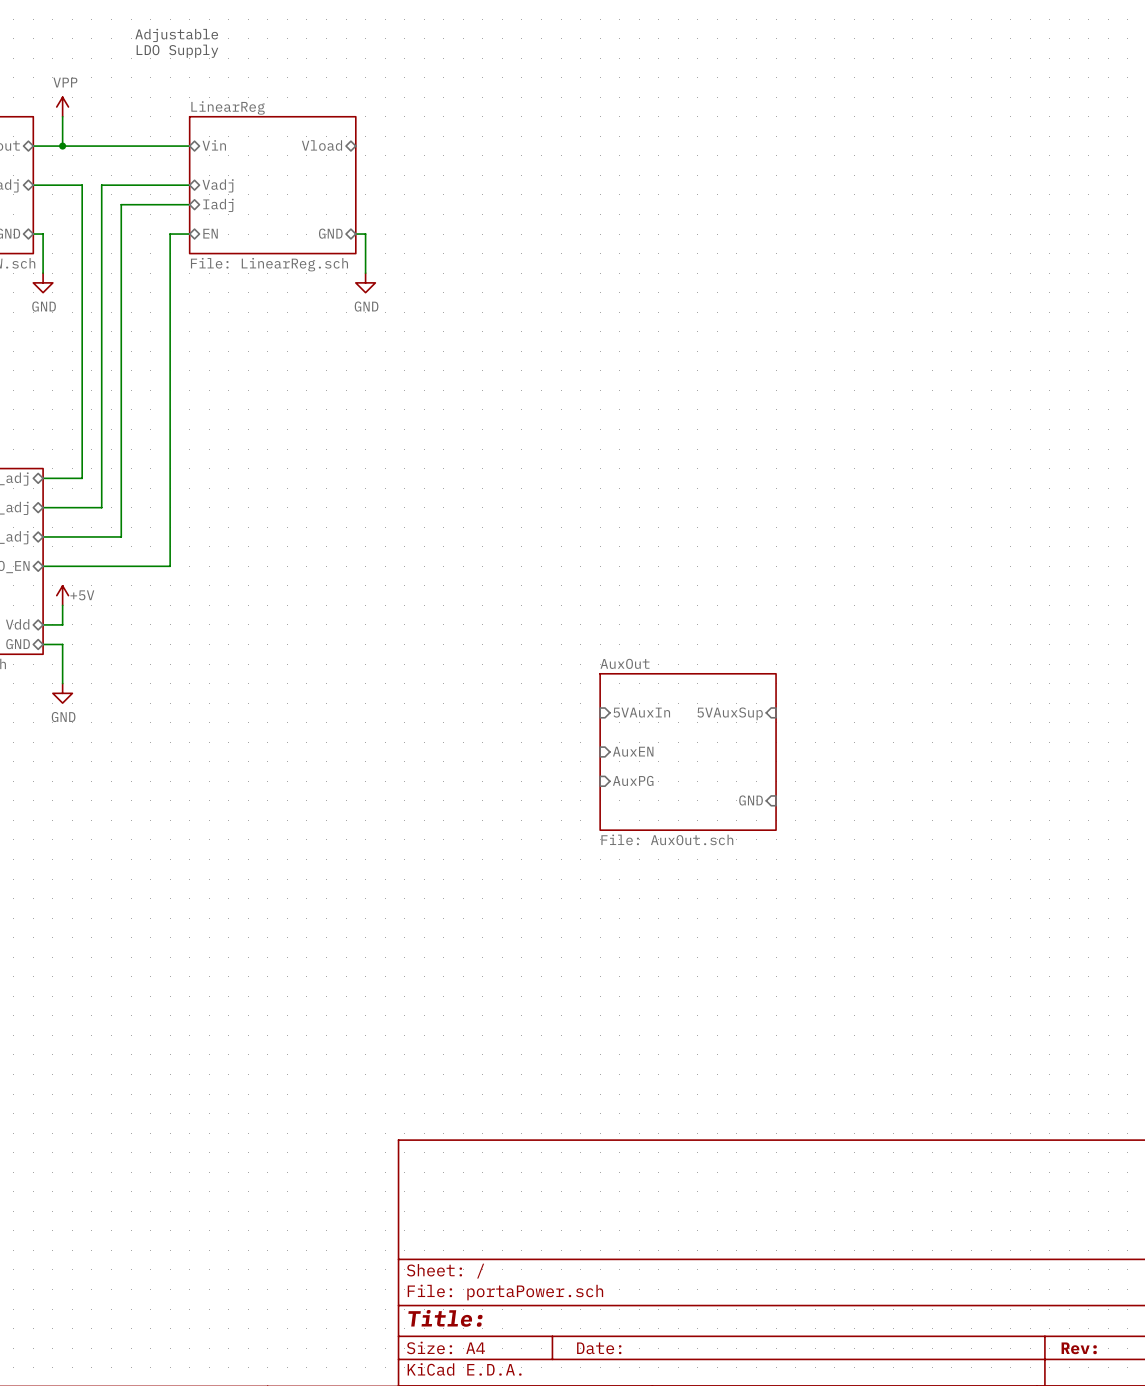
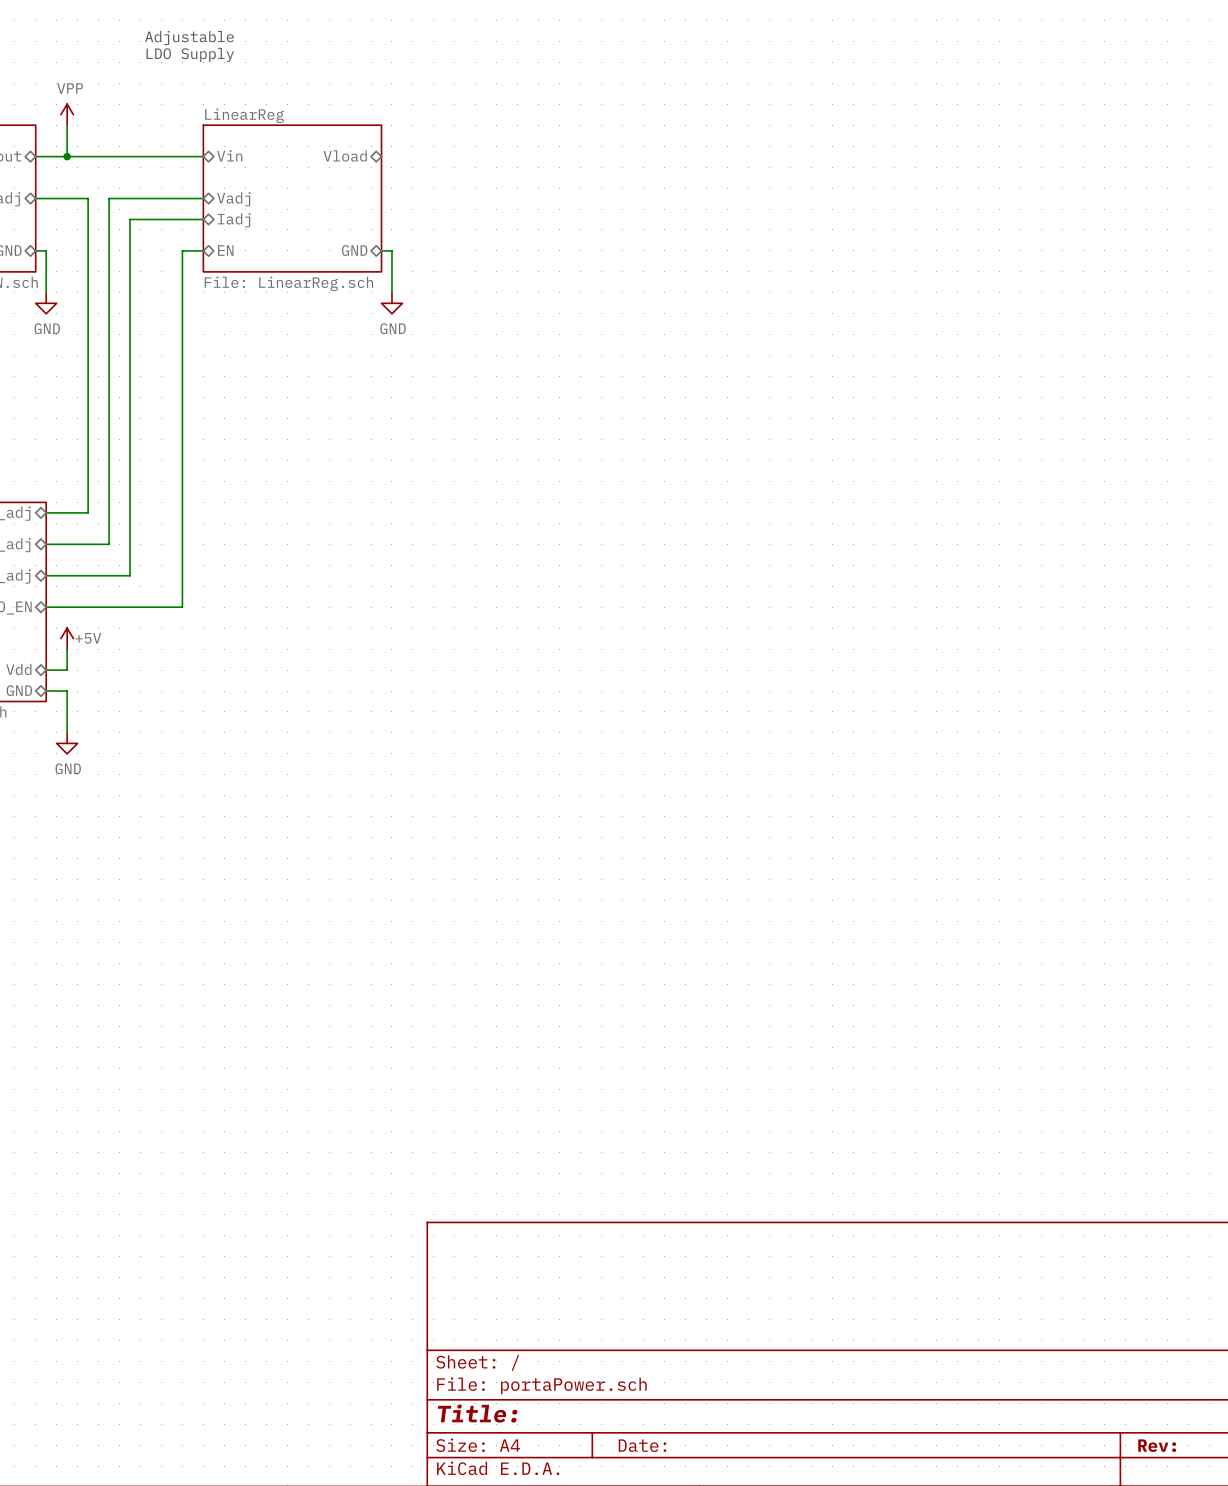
sheet pin: 5VAuxIn (641, 712) -> none
sheet pin: 5VAuxSup (730, 713) -> none
sheet pin: AuxEN (633, 751) -> none
sheet AuxOut: File: AuxOut.sch (688, 751) -> none
sheet pin: AuxPG (633, 780) -> none
sheet pin: GND (751, 800) -> none

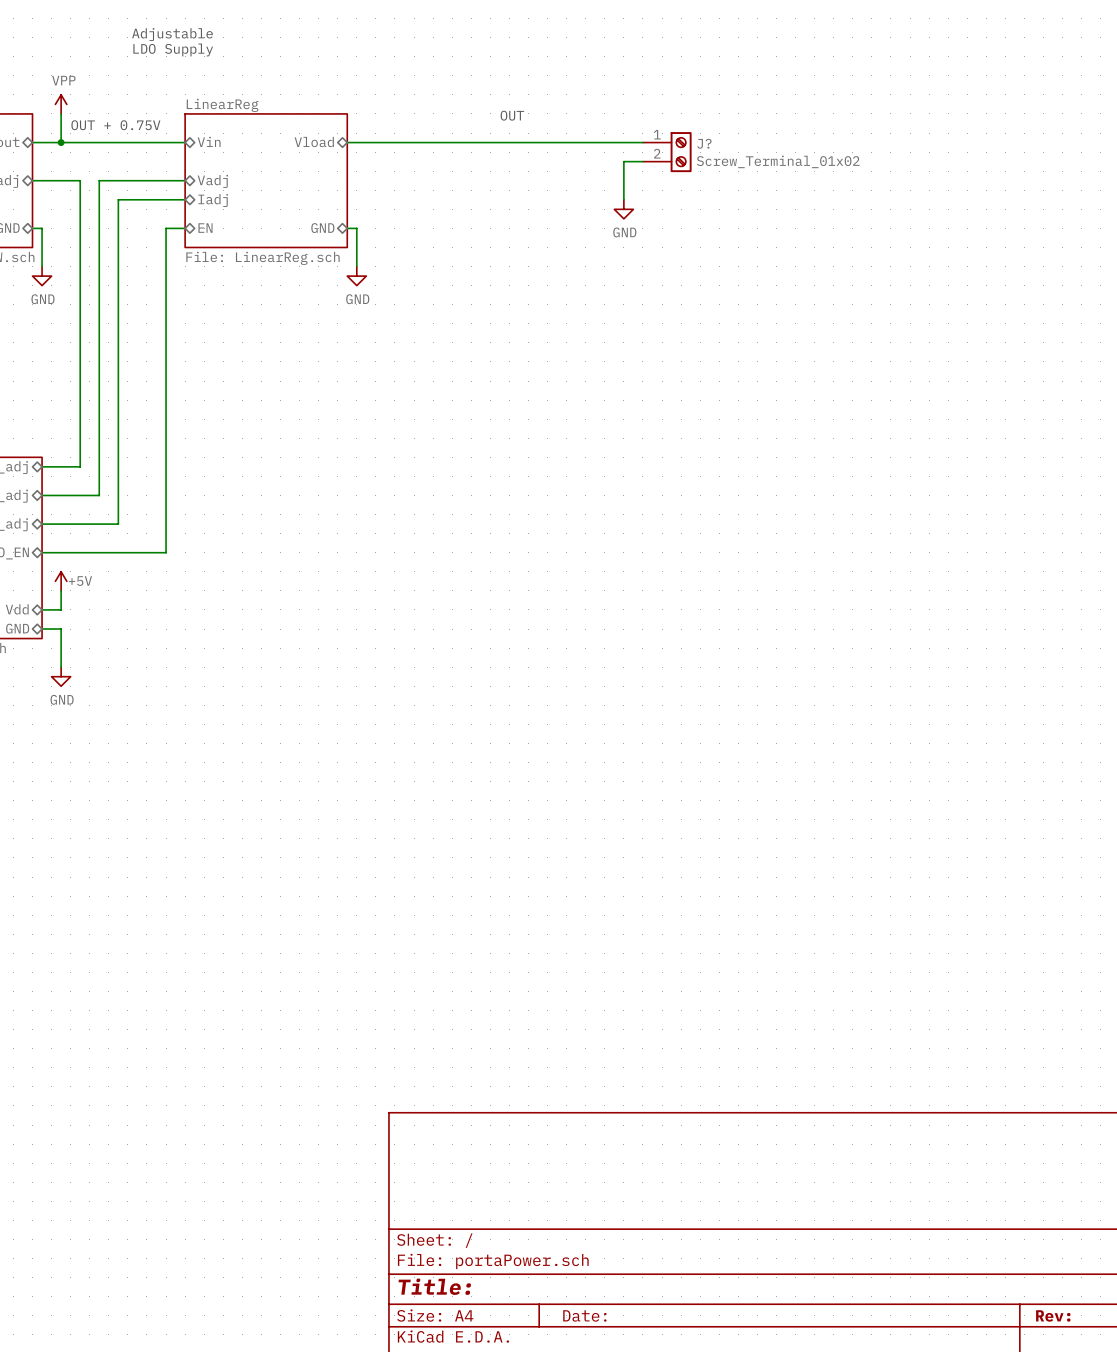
text: none -> OUT (512, 115)
text: none -> OUT + 0.75V (115, 125)
wire: none -> (347, 142) (642, 142)
J?: none -> Screw_Terminal_01x02 (667, 152)
wire: none -> (642, 161) (623, 161) (623, 199)
power symbol: none -> GND (623, 209)

